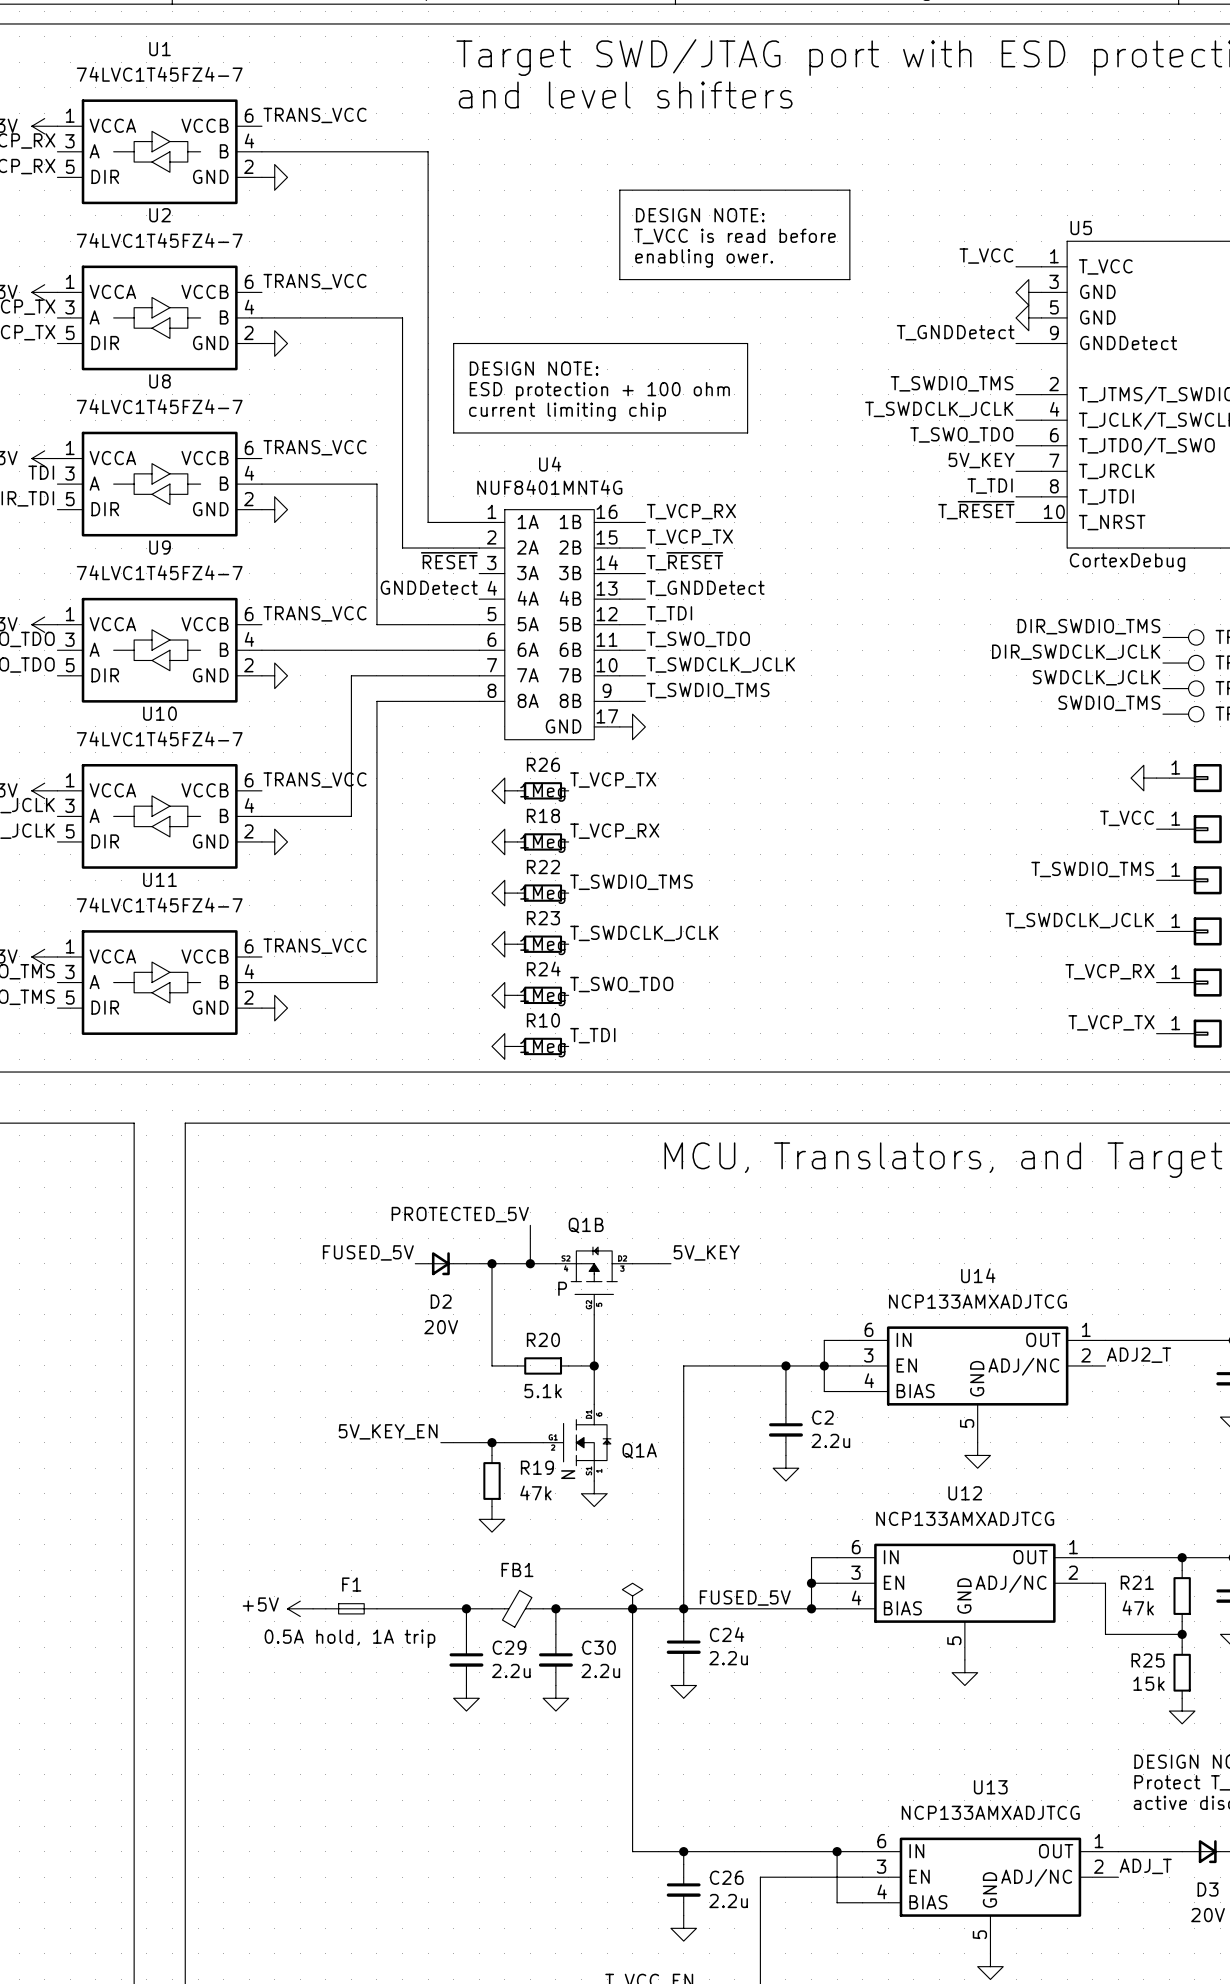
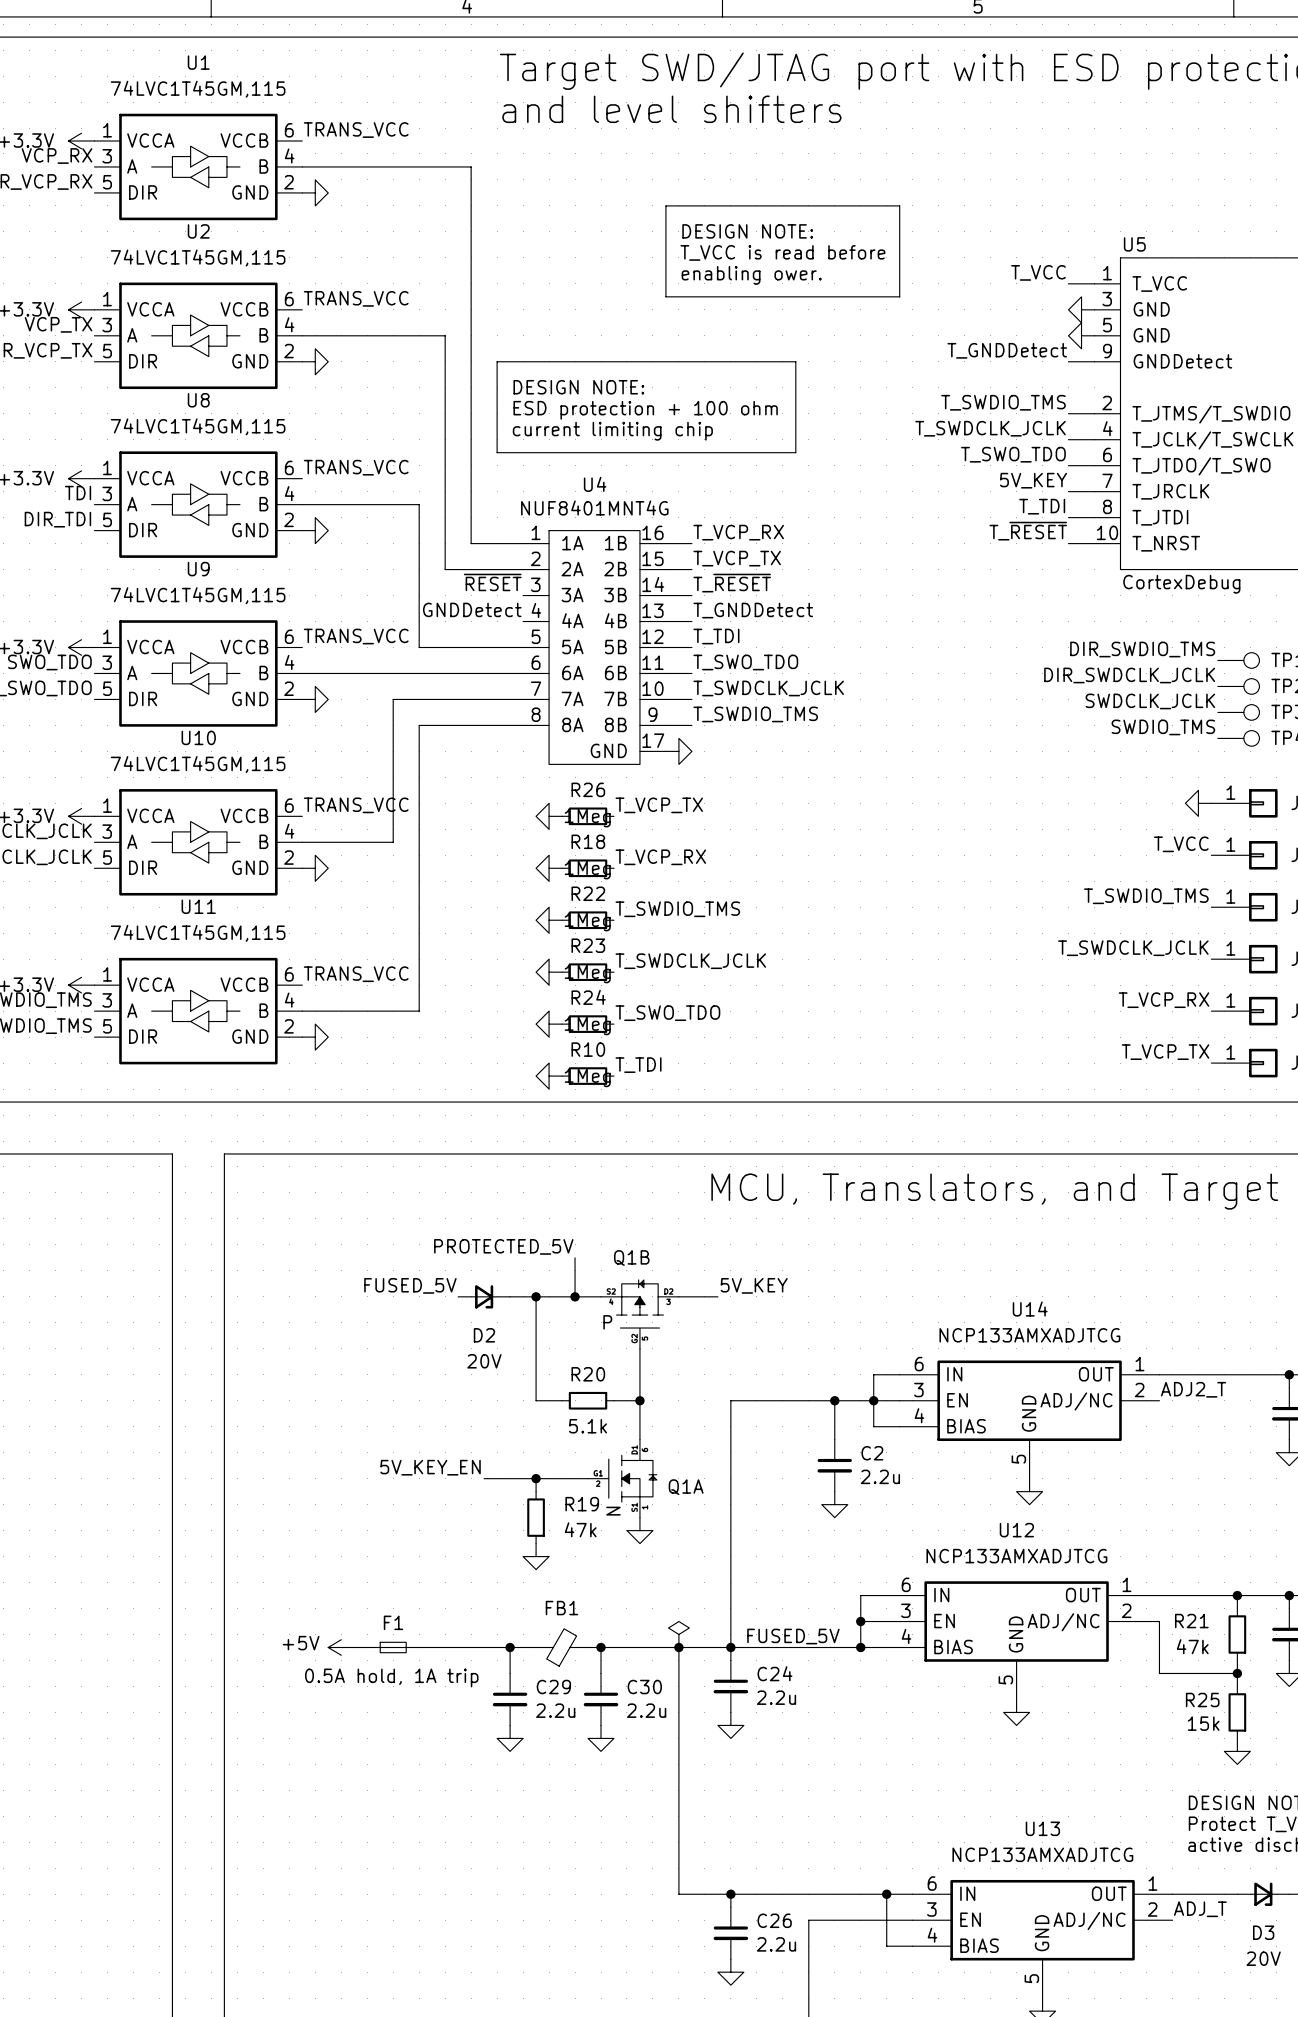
U1 value: 74LVC1T45FZ4-7 (159, 74) -> 74LVC1T45GM,115 (198, 89)
U2 value: 74LVC1T45FZ4-7 (159, 240) -> 74LVC1T45GM,115 (198, 258)
U8 value: 74LVC1T45FZ4-7 (159, 406) -> 74LVC1T45GM,115 (198, 426)
U9 value: 74LVC1T45FZ4-7 (159, 572) -> 74LVC1T45GM,115 (198, 595)
U10 value: 74LVC1T45FZ4-7 (159, 738) -> 74LVC1T45GM,115 (198, 764)
U11 value: 74LVC1T45FZ4-7 (159, 905) -> 74LVC1T45GM,115 (198, 933)

